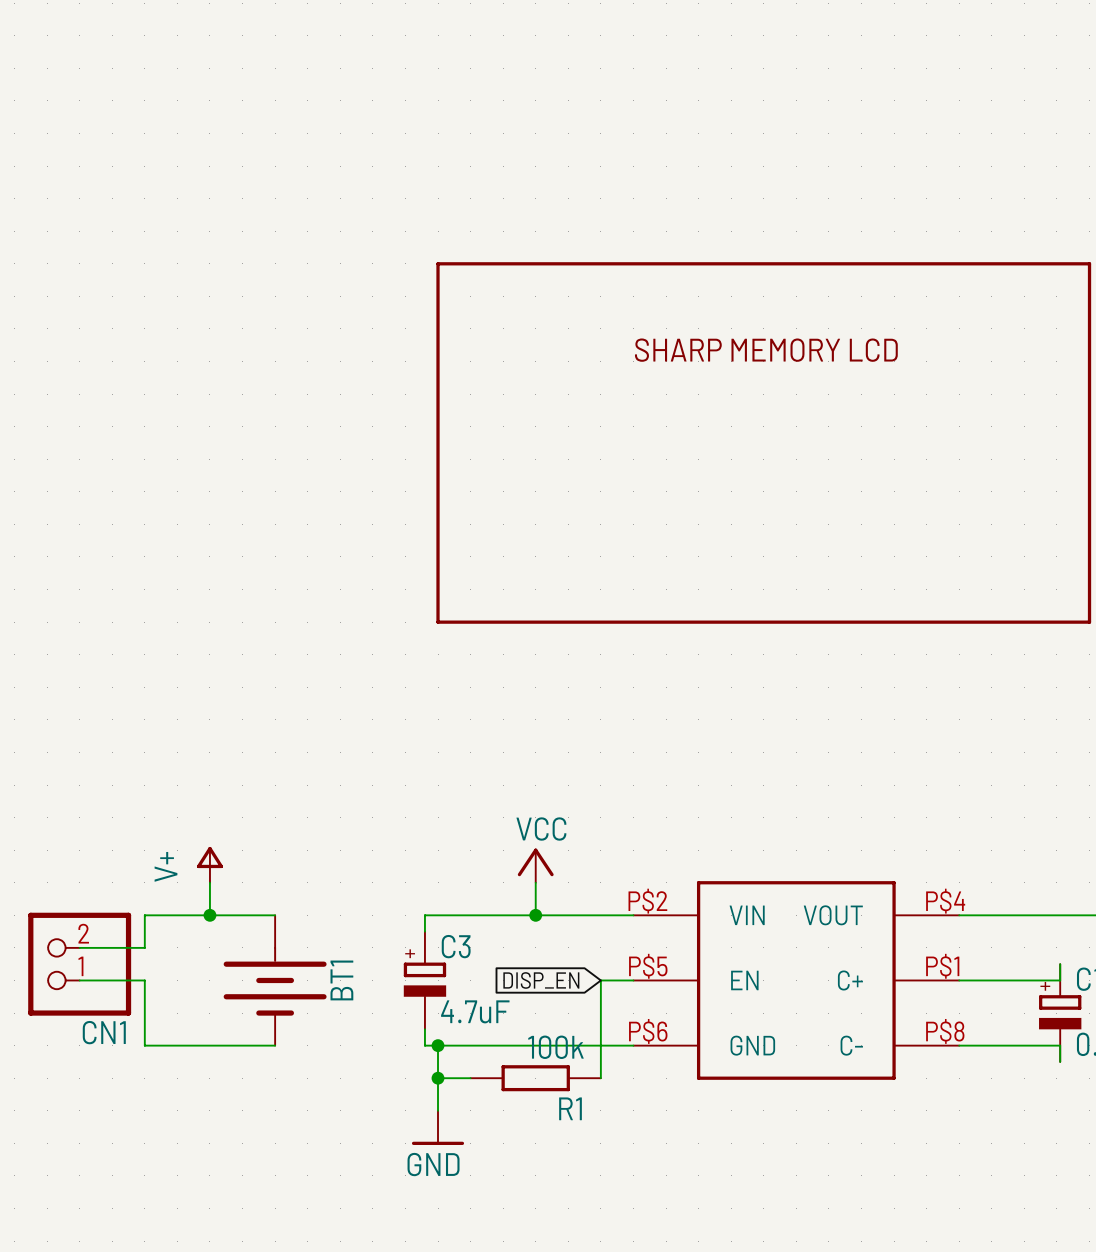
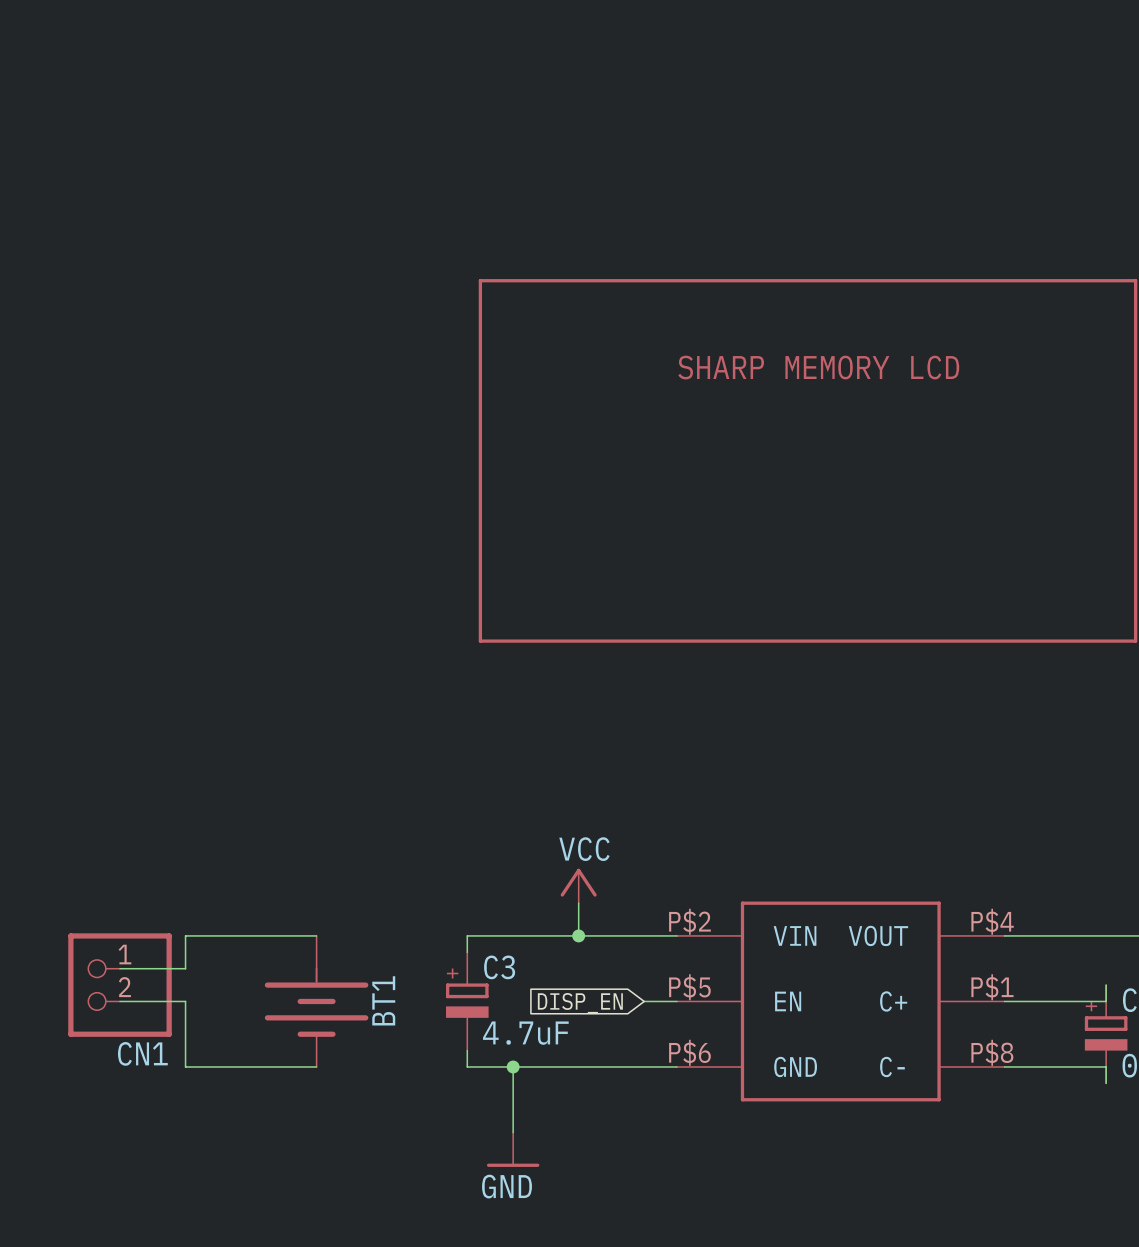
power symbol: V+ (209, 864) -> none
wire: (209, 882) (209, 915) -> none
junction: (209, 915) -> none
CN1 flip: as is (79, 964) -> up-down (120, 985)
wire: (600, 980) (600, 1078) -> none
wire: (438, 1045) (438, 1110) -> (513, 1066) (513, 1132)
junction: (438, 1045) -> none
junction: none -> (513, 1066)
wire: (438, 1078) (470, 1078) -> none
junction: (438, 1078) -> none
R1: 100k (535, 1078) -> none
power symbol position: GND (438, 1127) -> GND (513, 1149)

